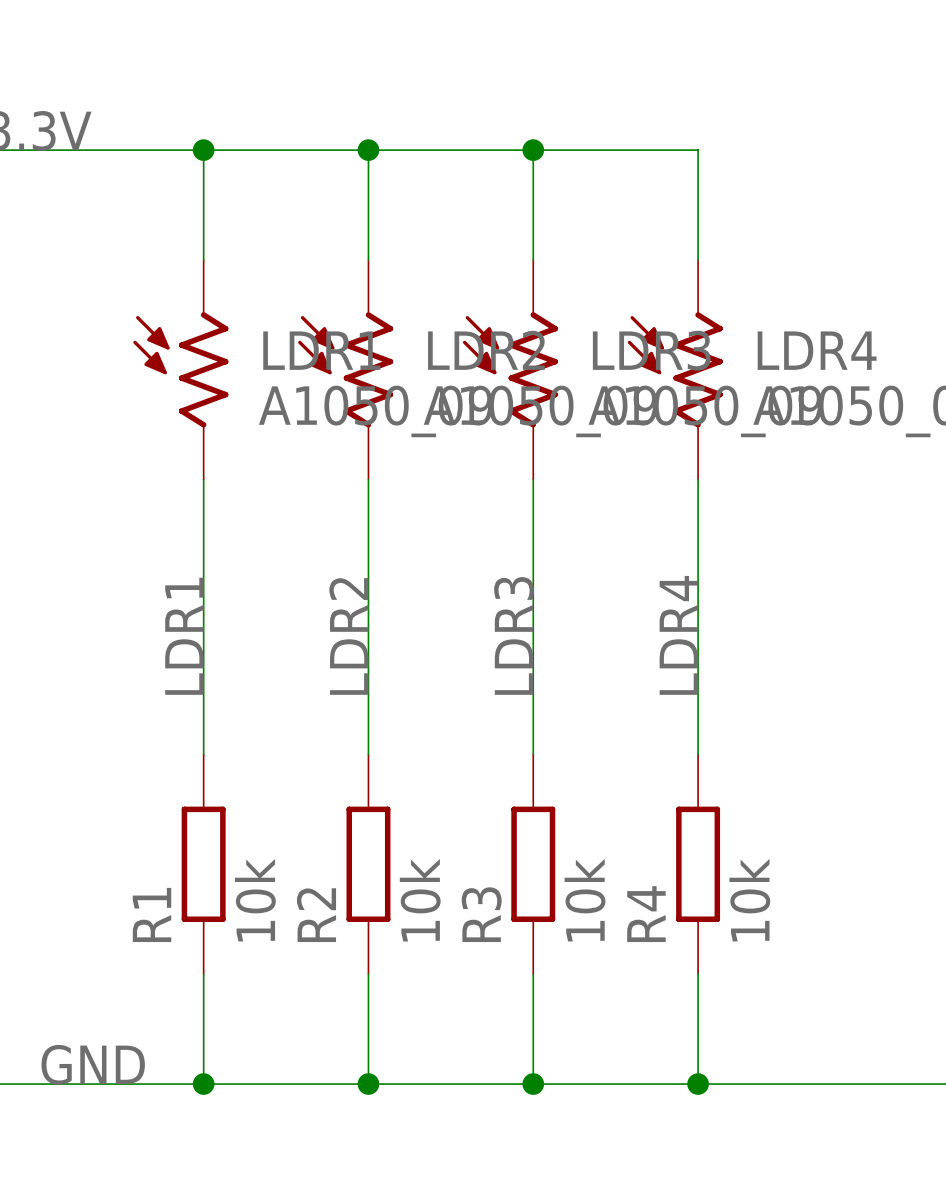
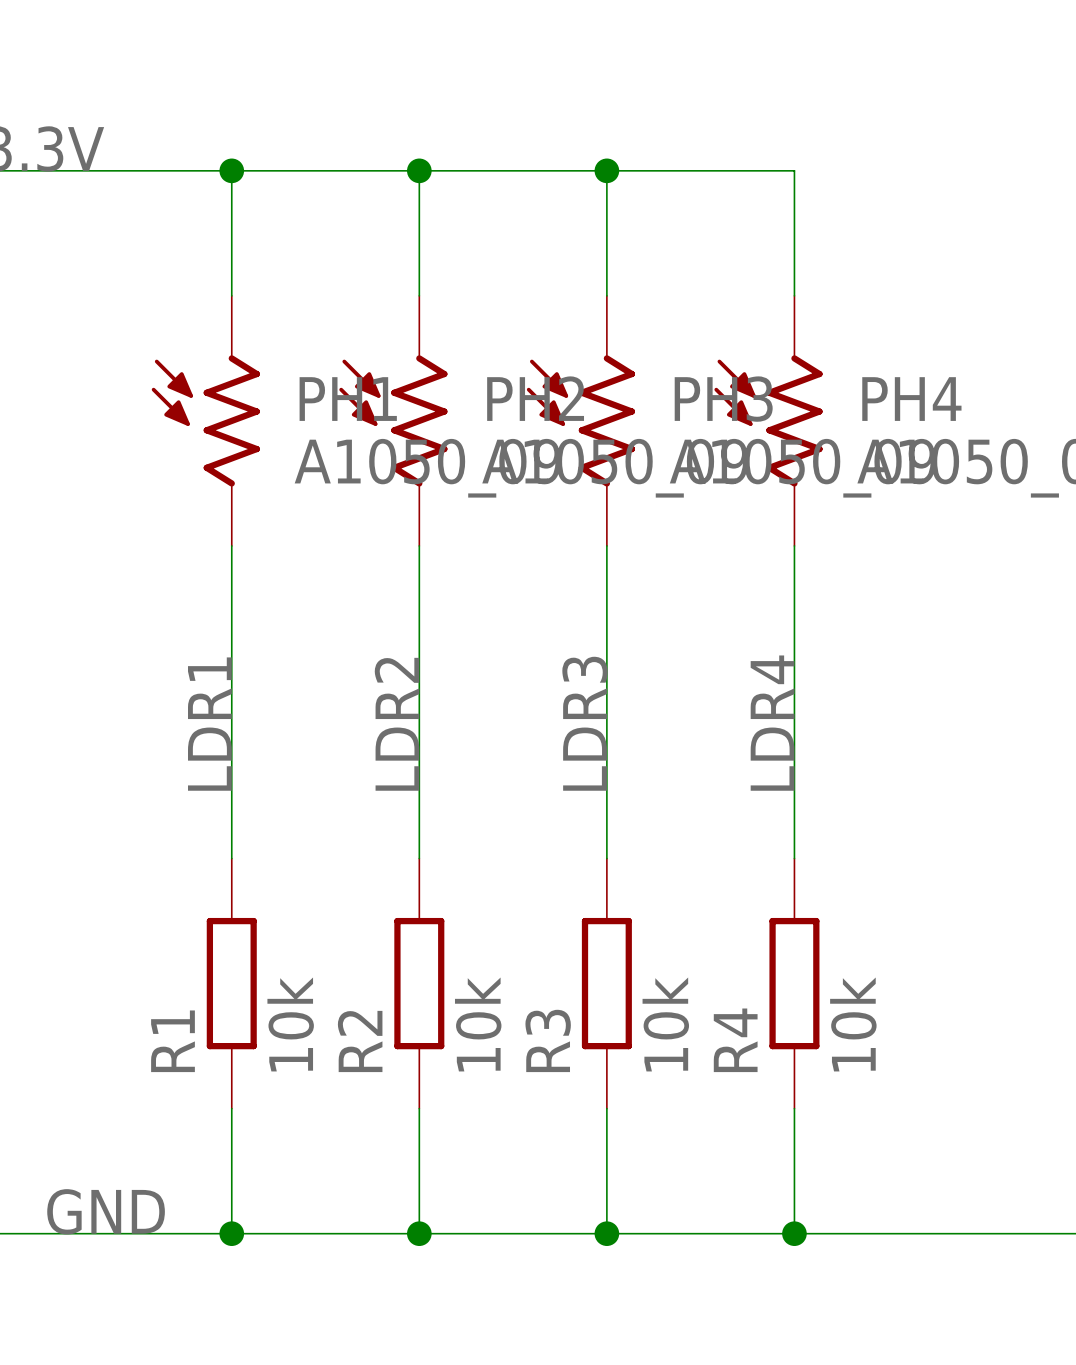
LDR1 name: LDR1 (321, 350) -> PH1 (348, 399)
LDR2 name: LDR2 (486, 350) -> PH2 (535, 398)
LDR3 name: LDR3 (651, 350) -> PH3 (723, 399)
LDR4 name: LDR4 (817, 350) -> PH4 (911, 399)

